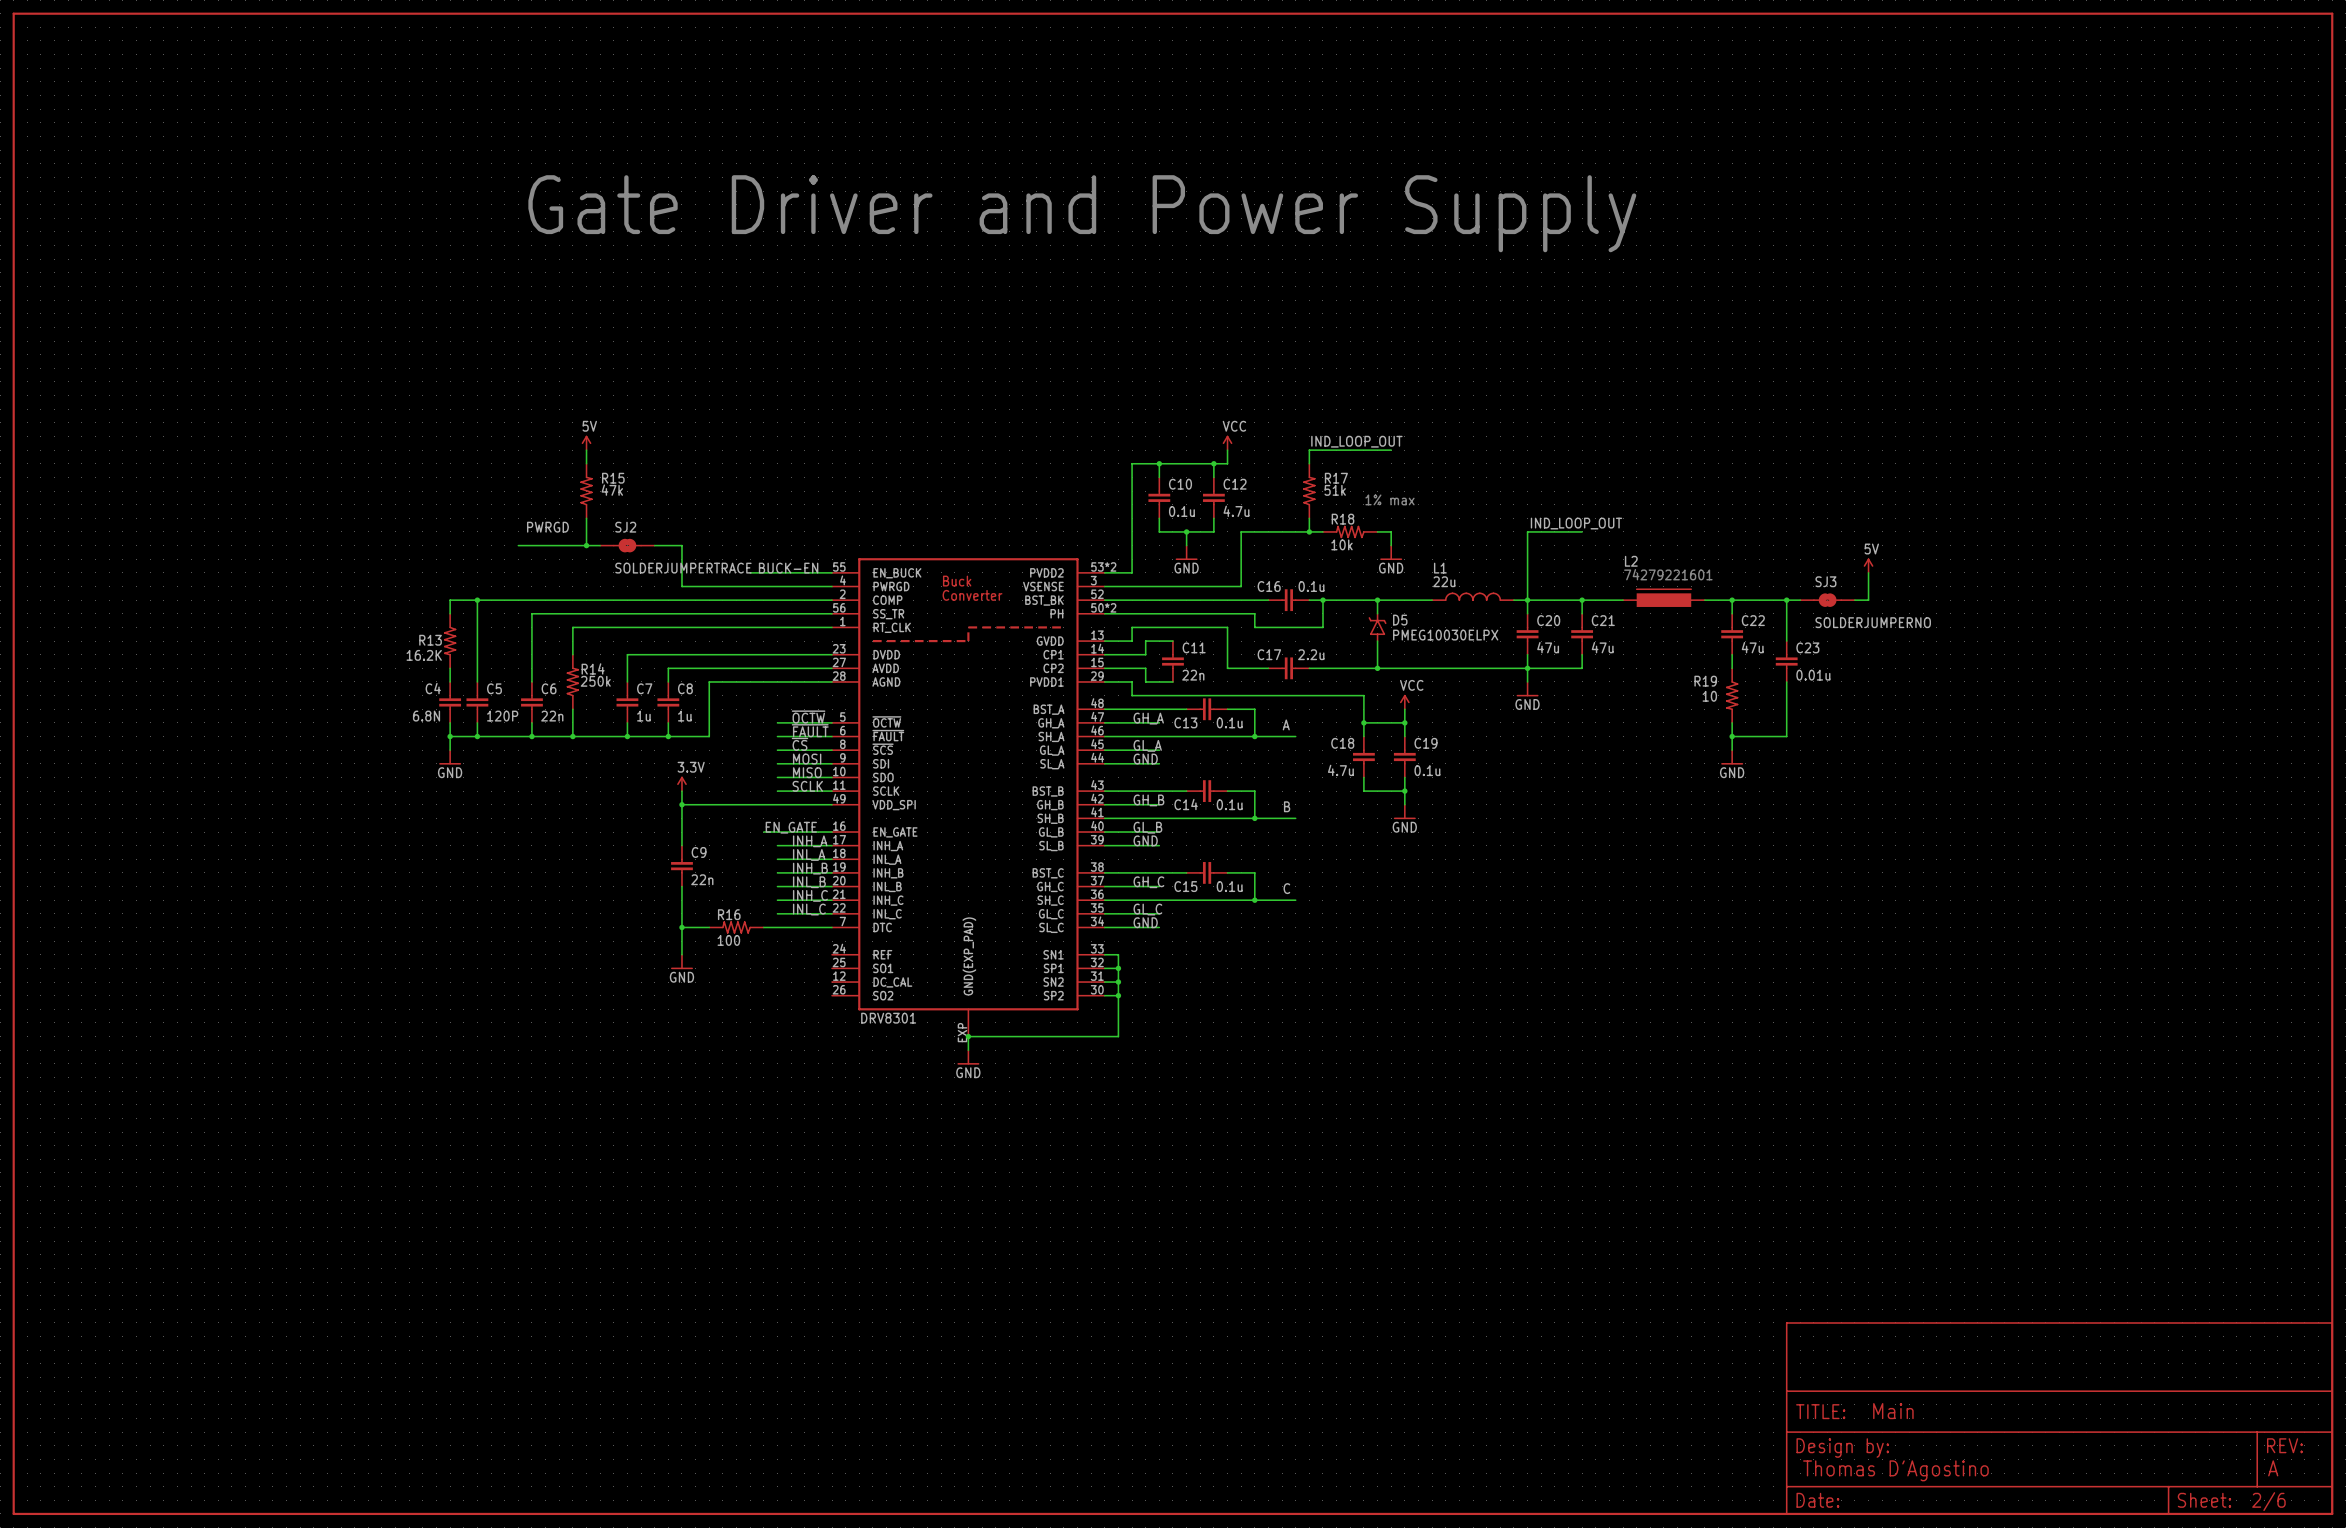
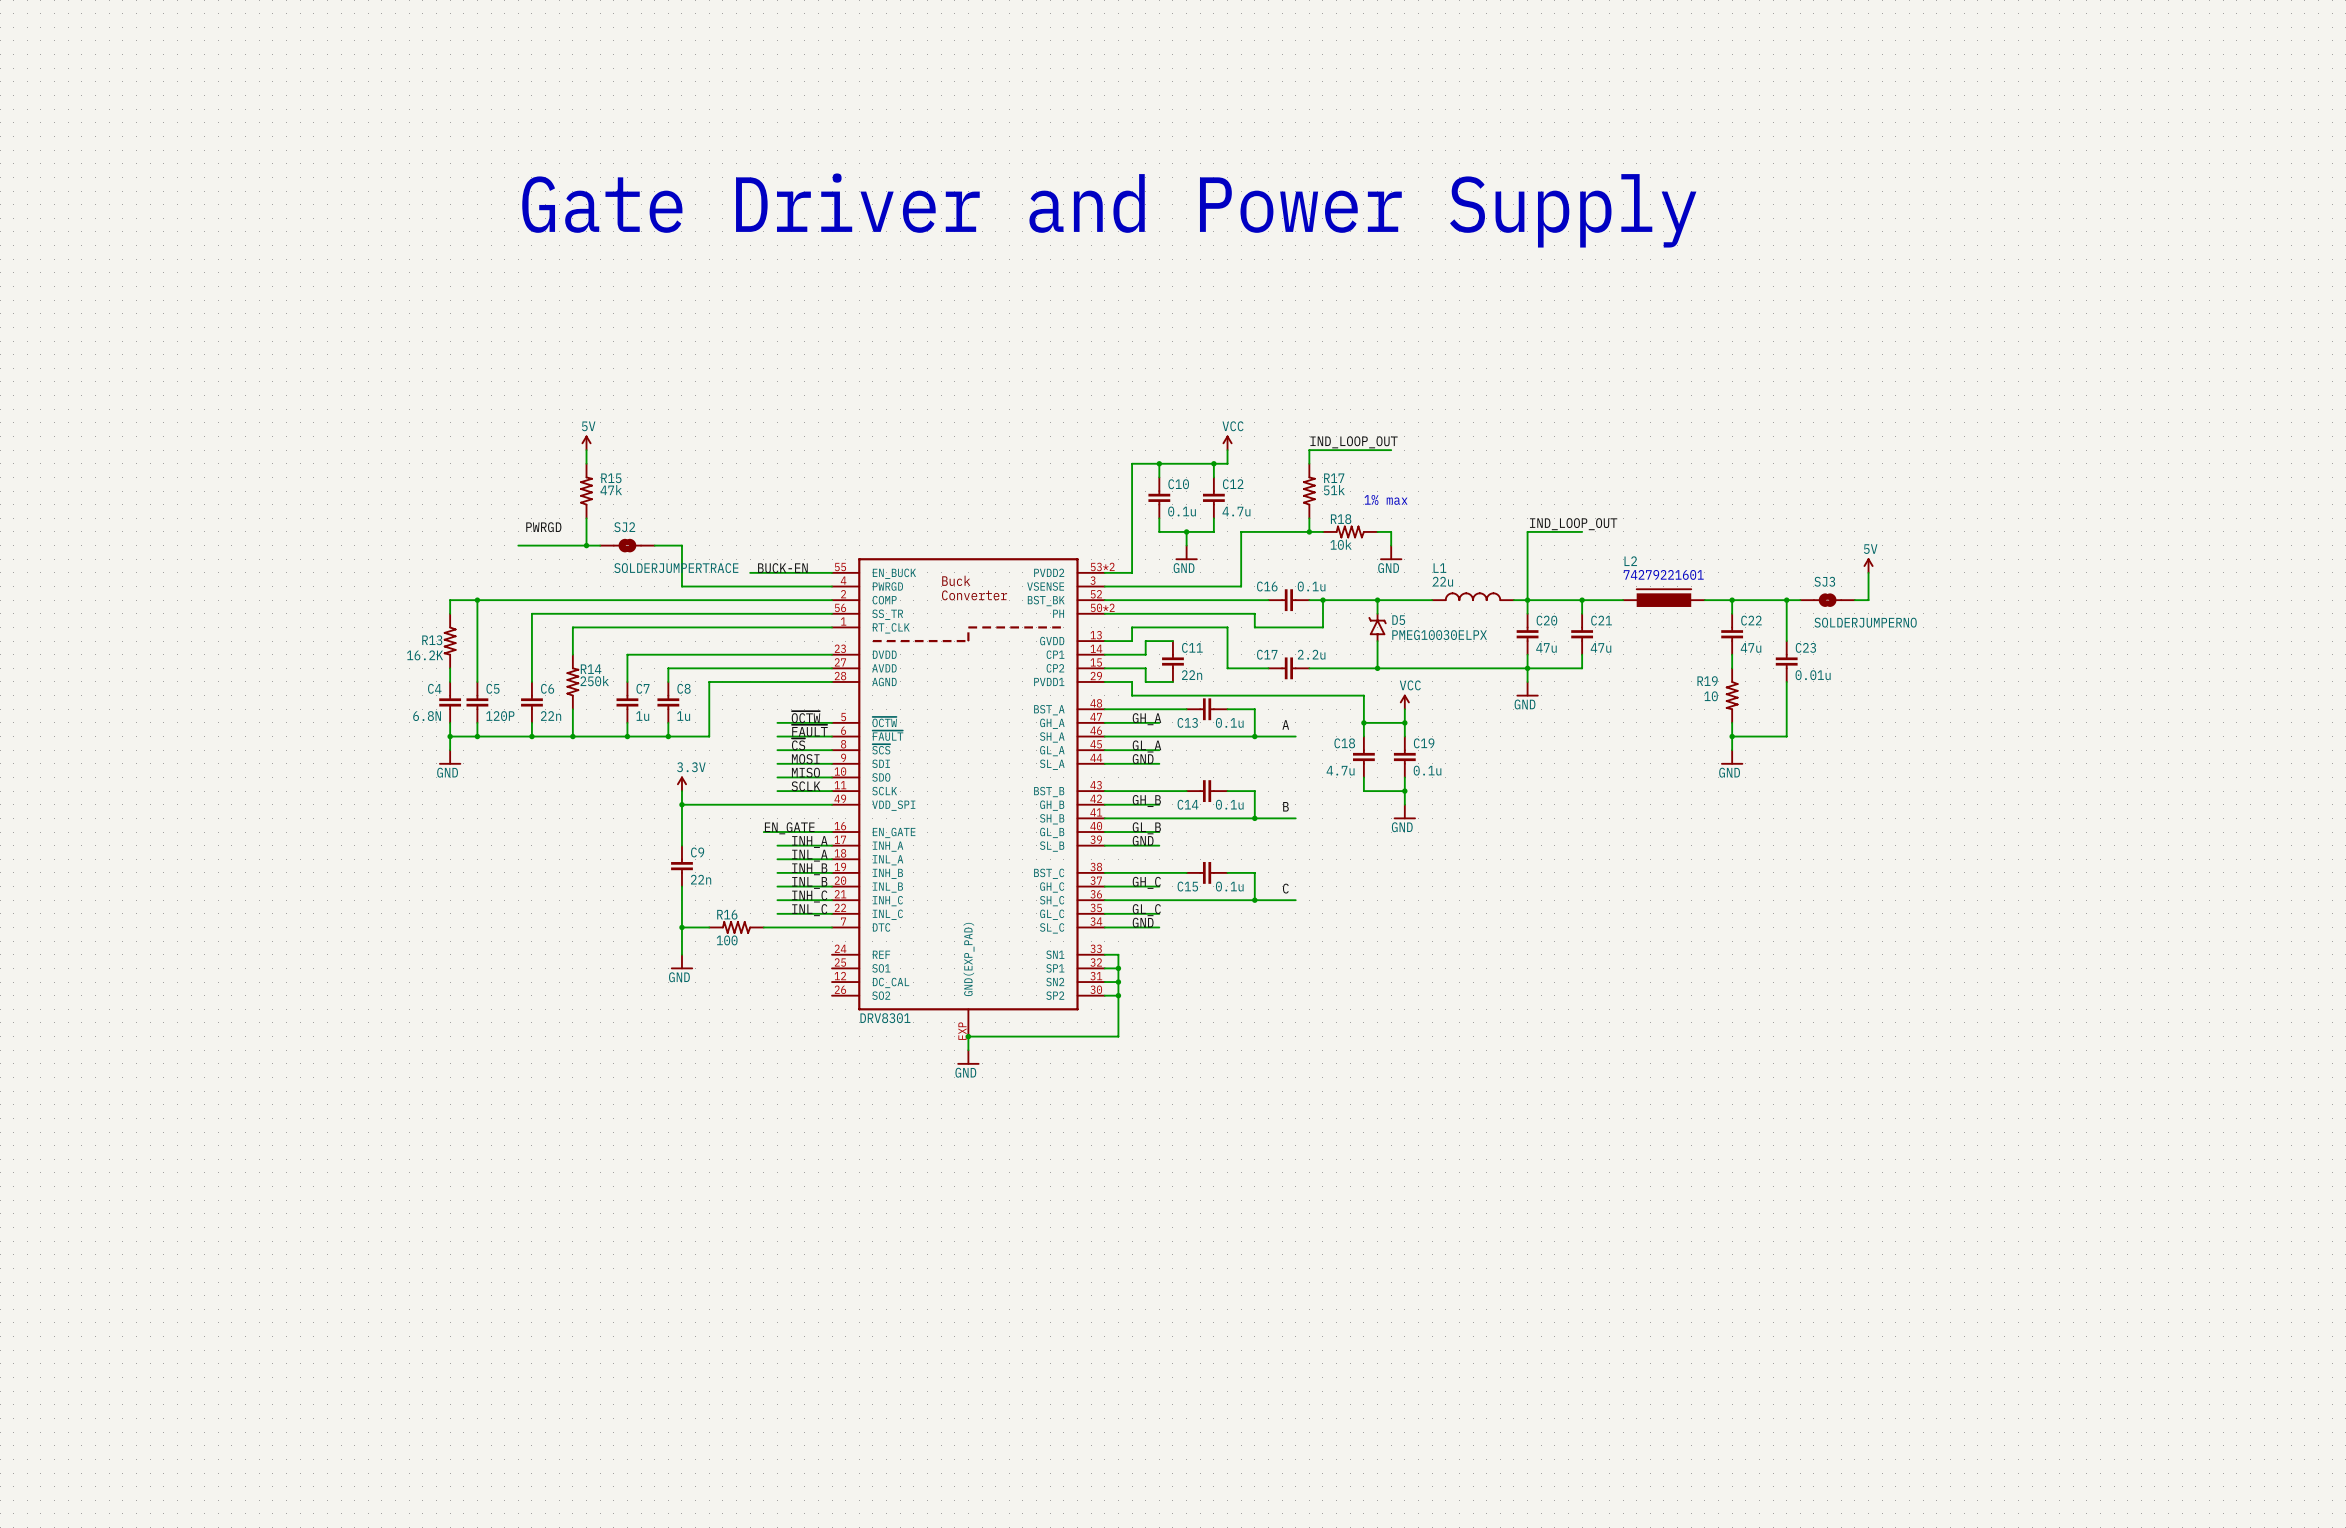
part: (1172, 763) -> none
part: (2059, 1418) -> none

